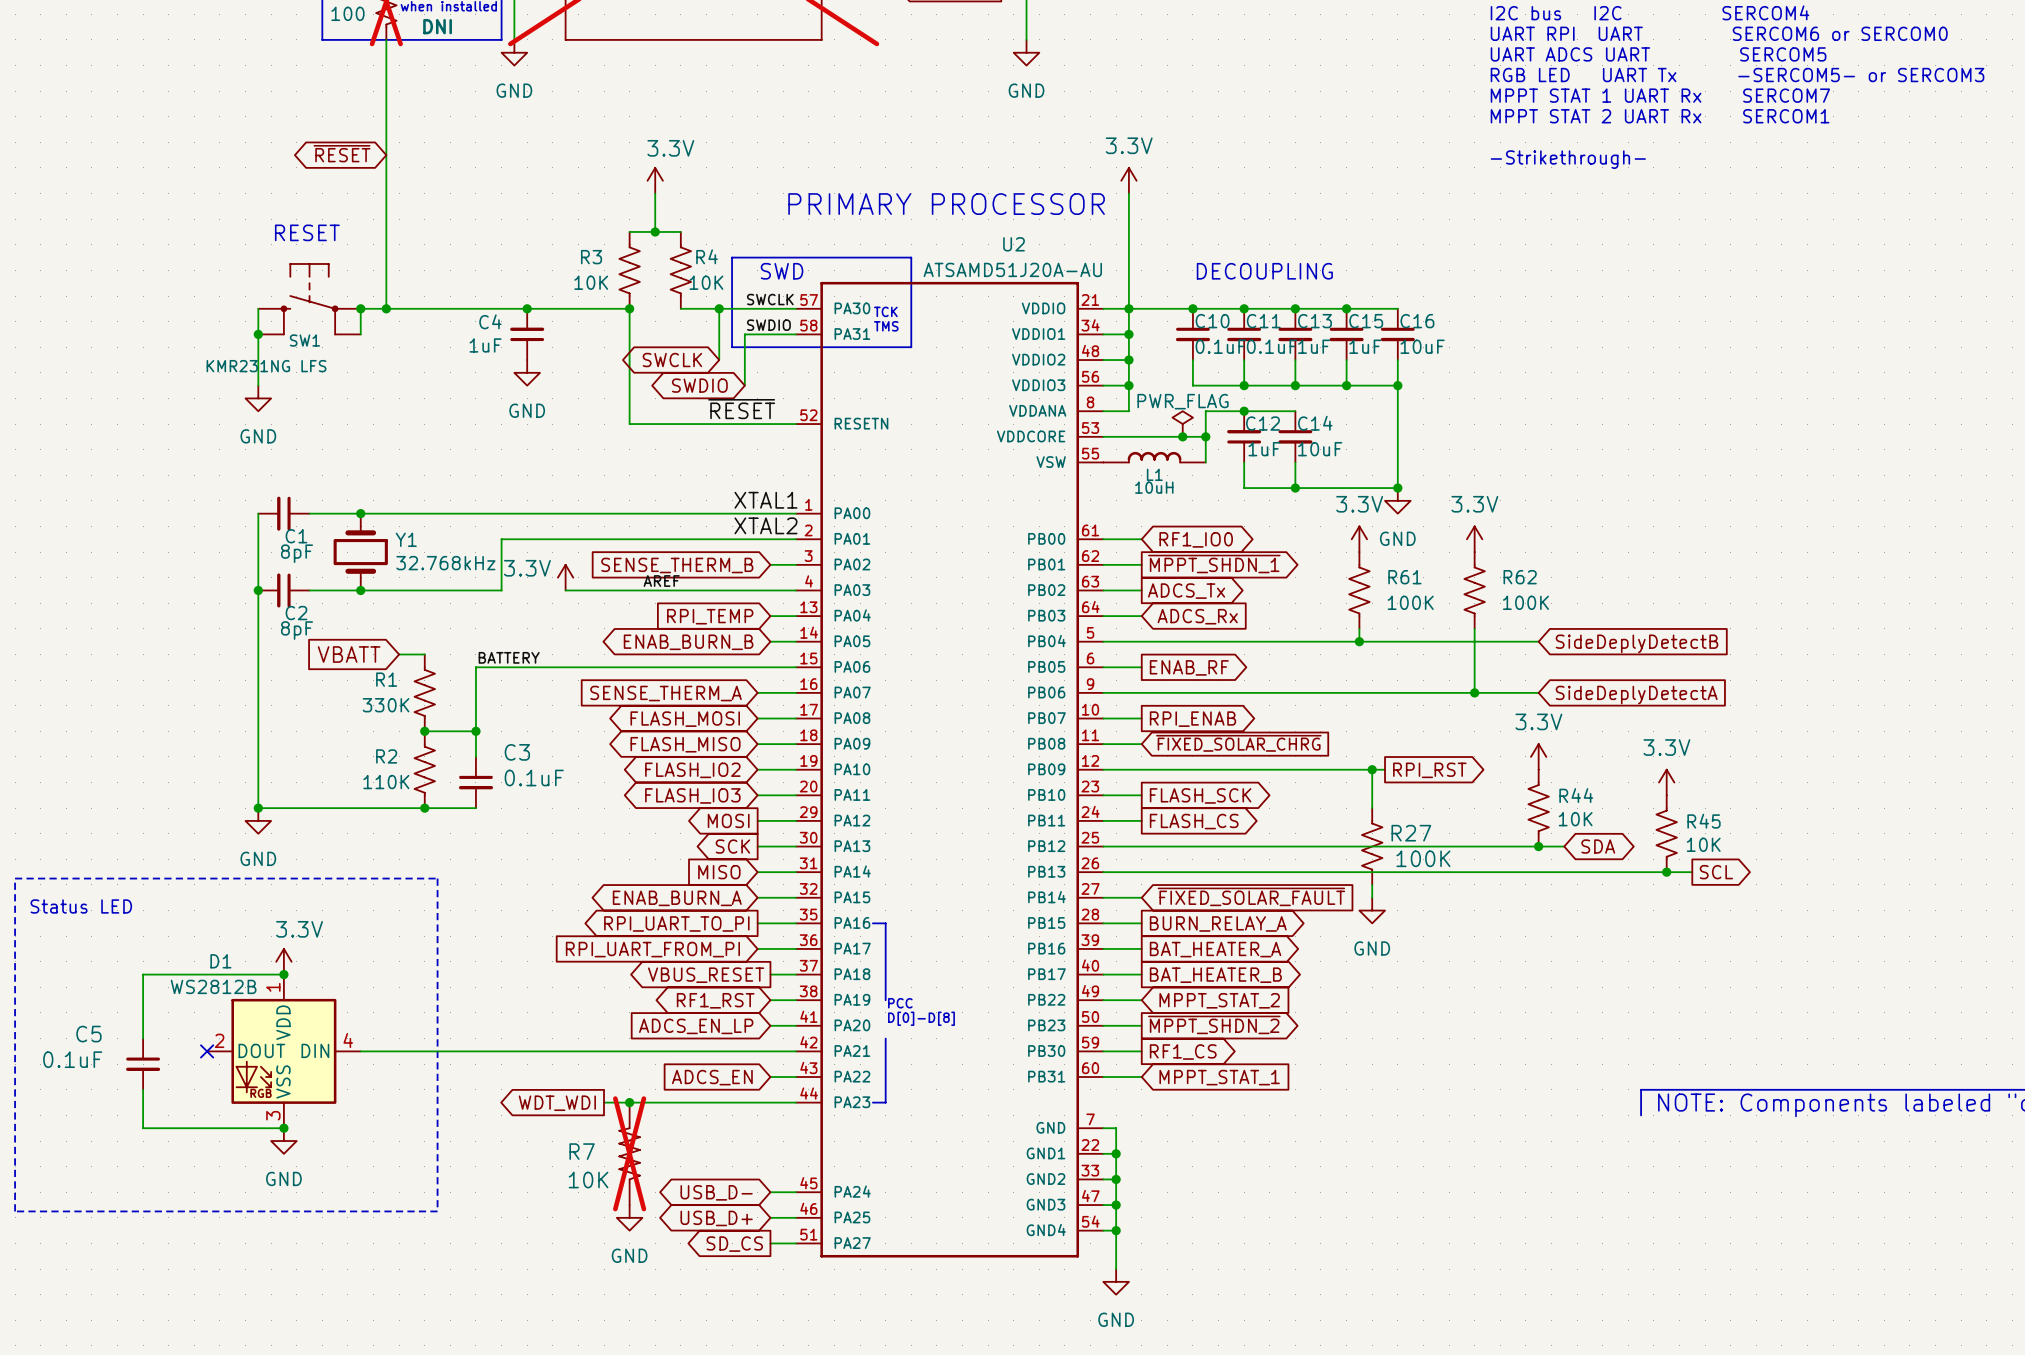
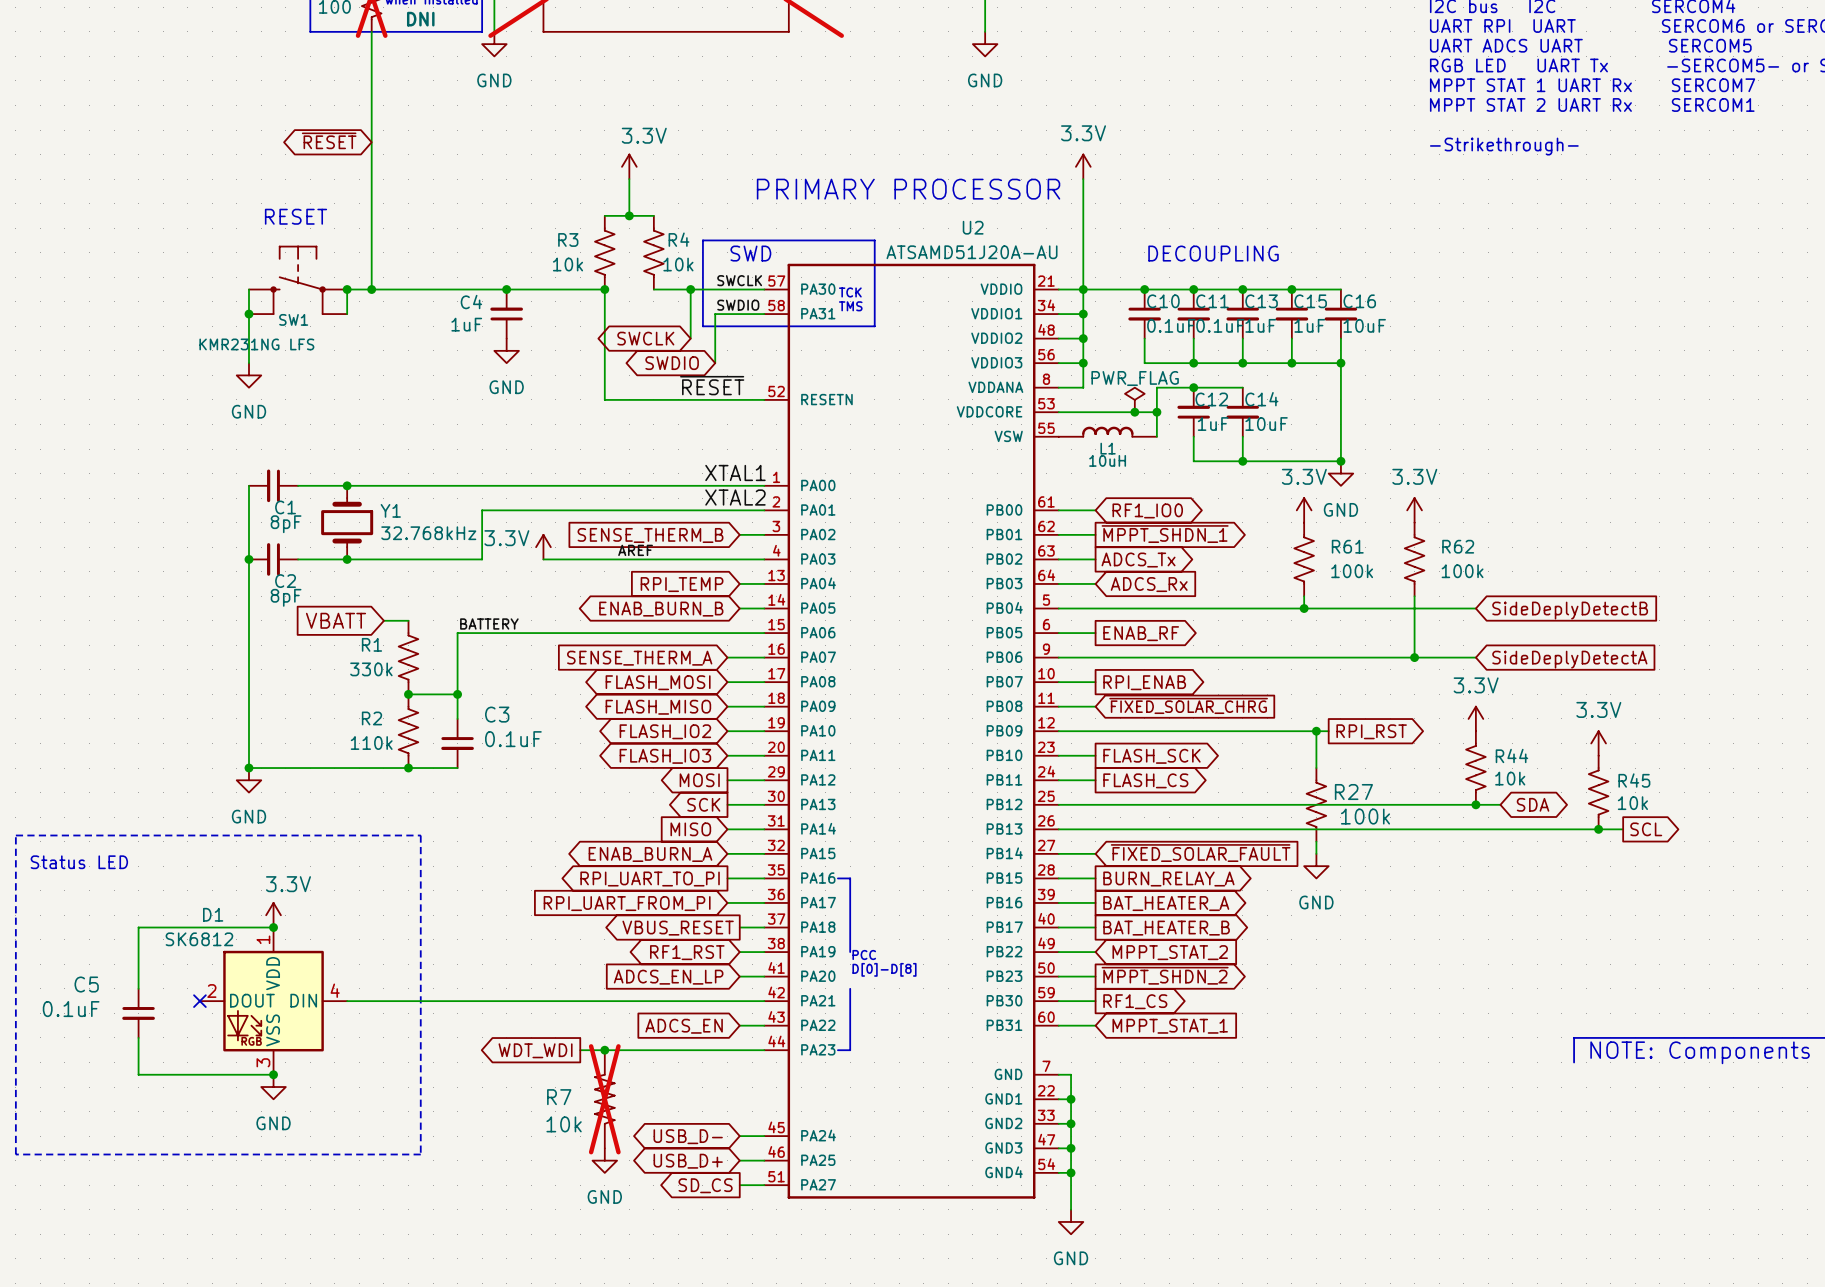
R3 value: 10K (591, 282) -> 10k (567, 264)
R4 value: 10K (706, 282) -> 10k (678, 264)
R61 value: 100K (1410, 602) -> 100k (1352, 571)
R62 value: 100K (1525, 602) -> 100k (1462, 571)
R1 value: 330K (386, 705) -> 330k (371, 669)
R2 value: 110K (386, 782) -> 110k (371, 743)
R44 value: 10K (1575, 819) -> 10k (1510, 778)
R45 value: 10K (1703, 844) -> 10k (1632, 803)
R27 value: 100K (1423, 858) -> 100k (1365, 816)
D1 value: WS2812B (213, 986) -> SK6812 (199, 939)
R7 value: 10K (588, 1180) -> 10k (564, 1124)

